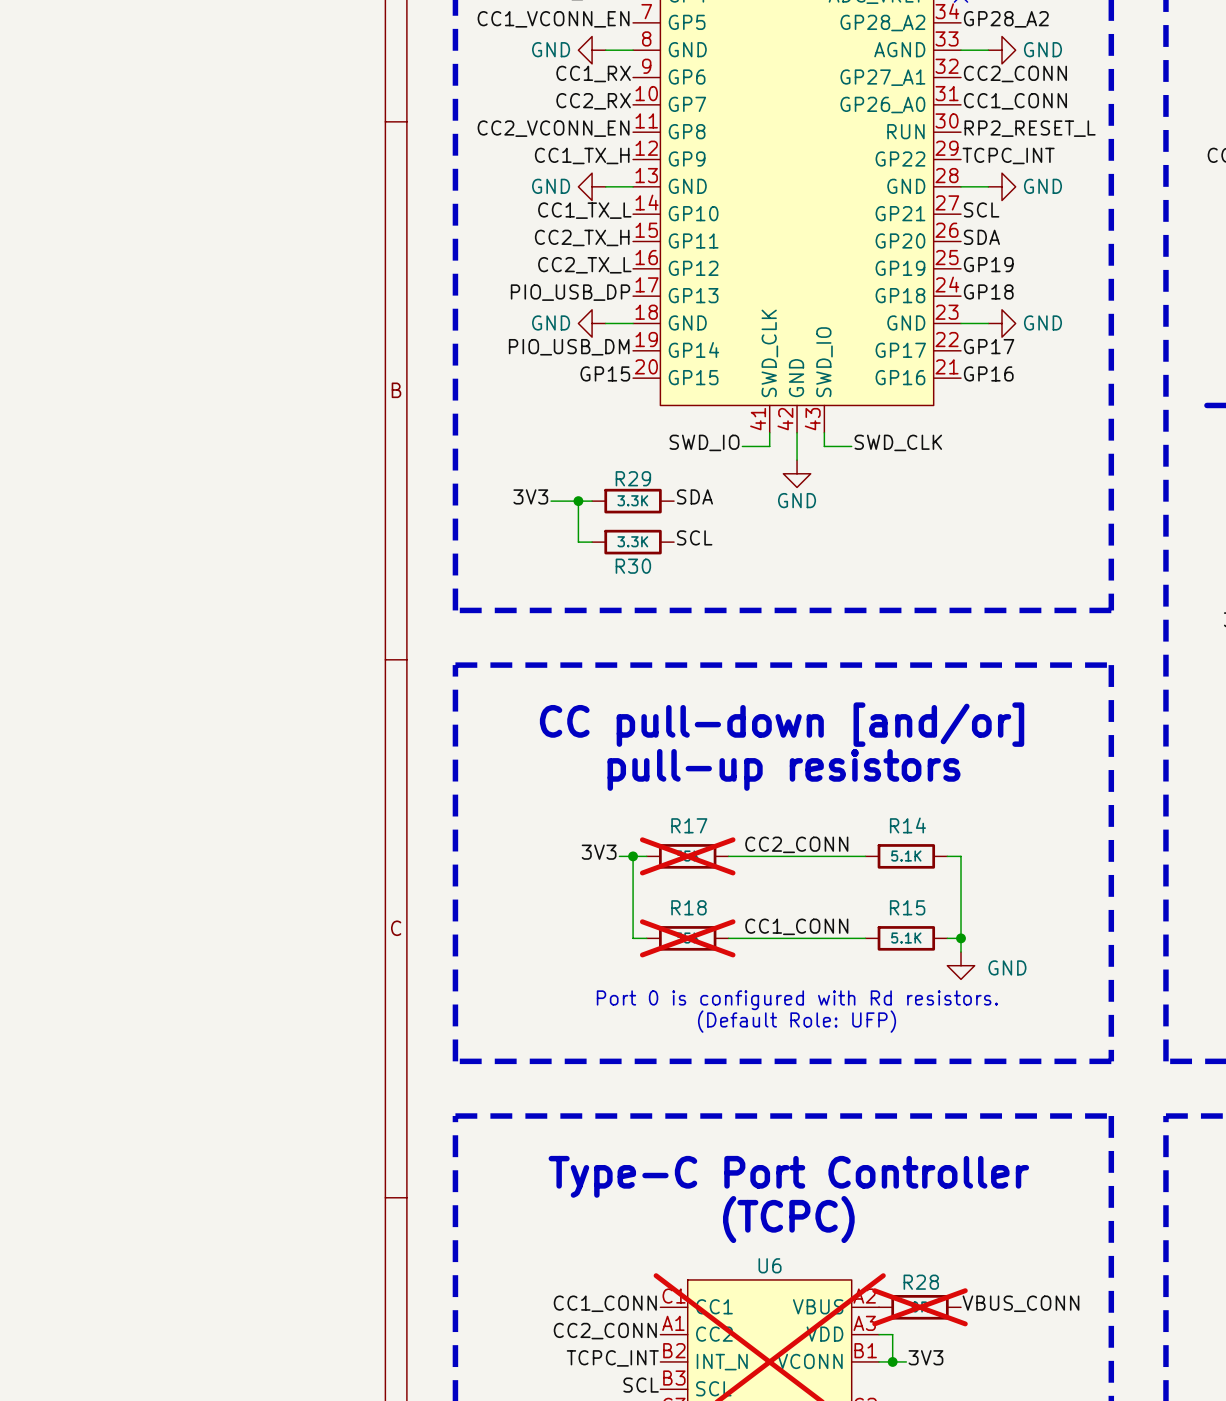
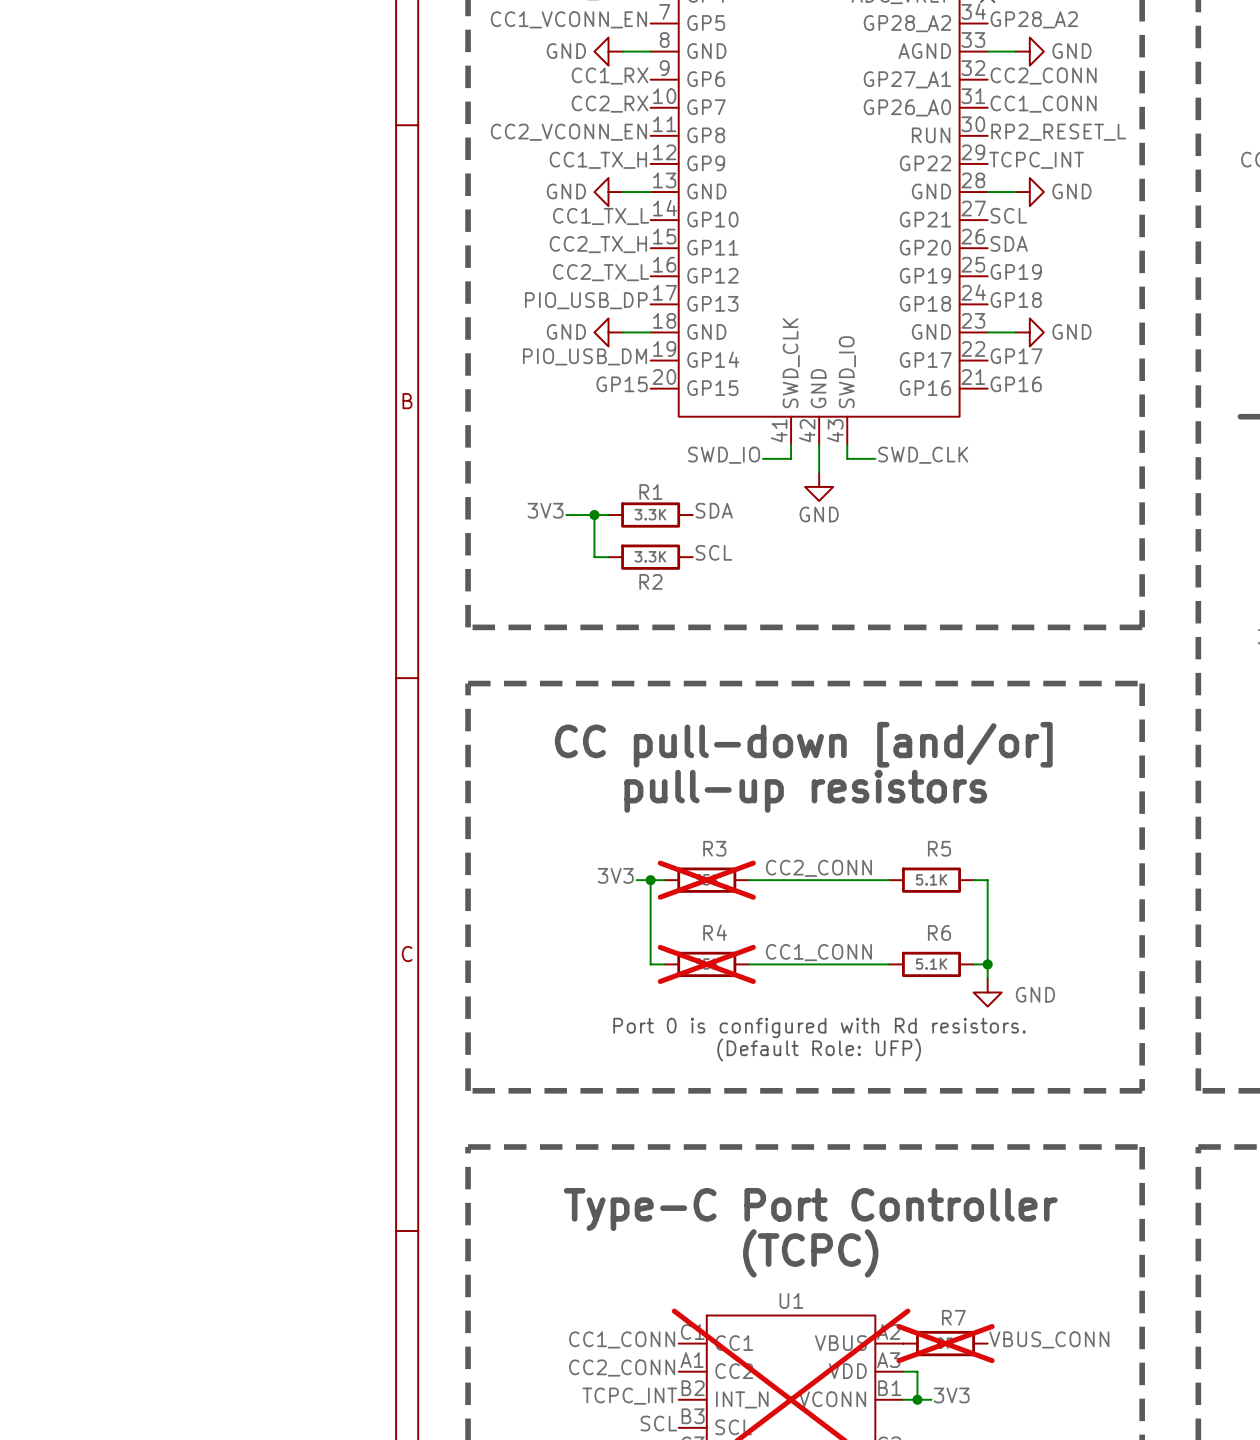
R29 name: R29 (633, 478) -> R1 (650, 492)
R30 name: R30 (633, 566) -> R2 (650, 581)
R17 name: R17 (689, 825) -> R3 (714, 848)
R14 name: R14 (907, 825) -> R5 (939, 848)
R18 name: R18 (688, 907) -> R4 (715, 932)
R15 name: R15 (907, 907) -> R6 (939, 933)
U6 name: U6 (770, 1265) -> U1 (791, 1300)
R28 name: R28 (921, 1282) -> R7 (953, 1317)

